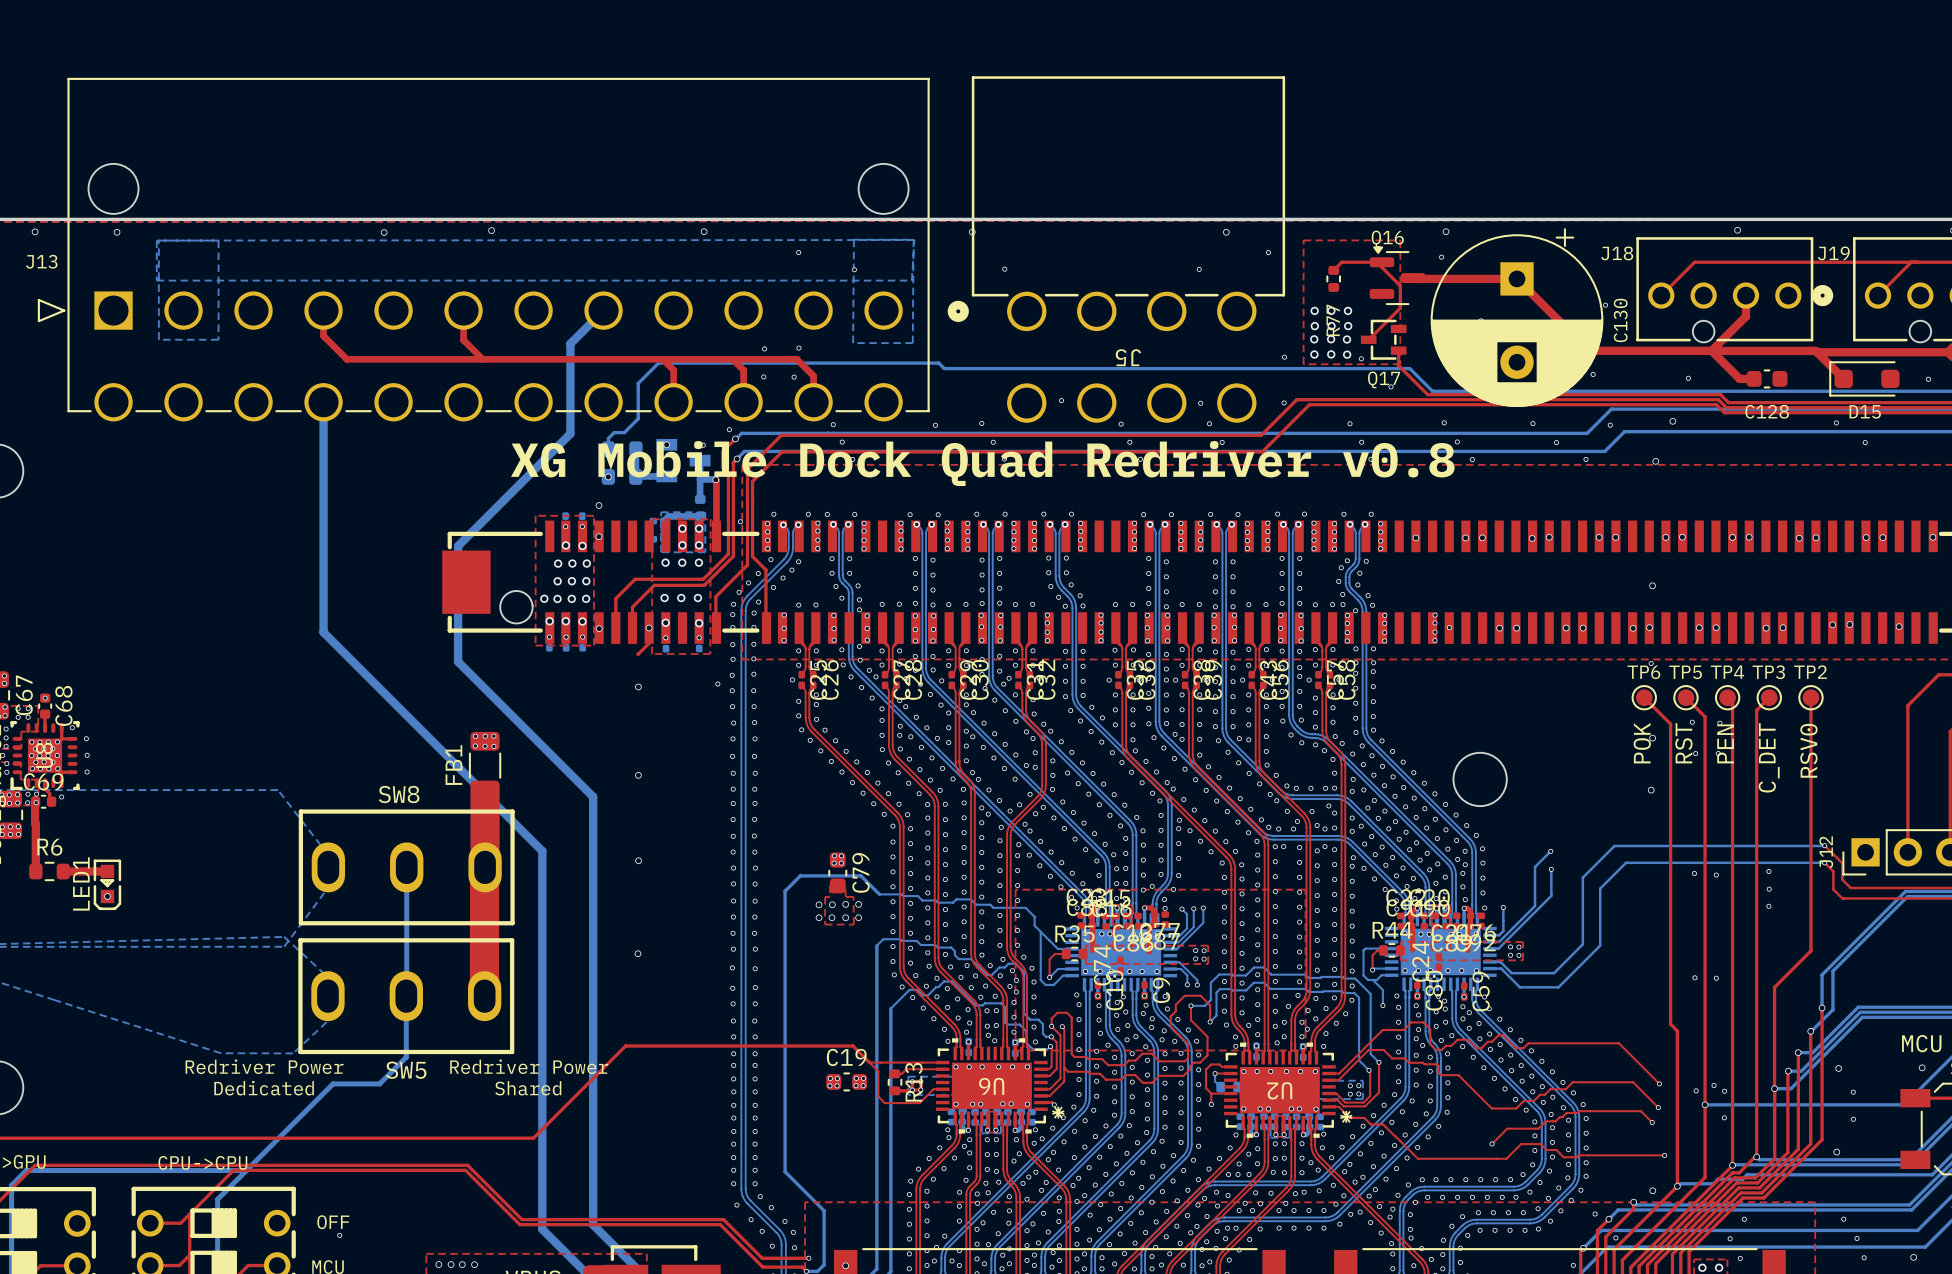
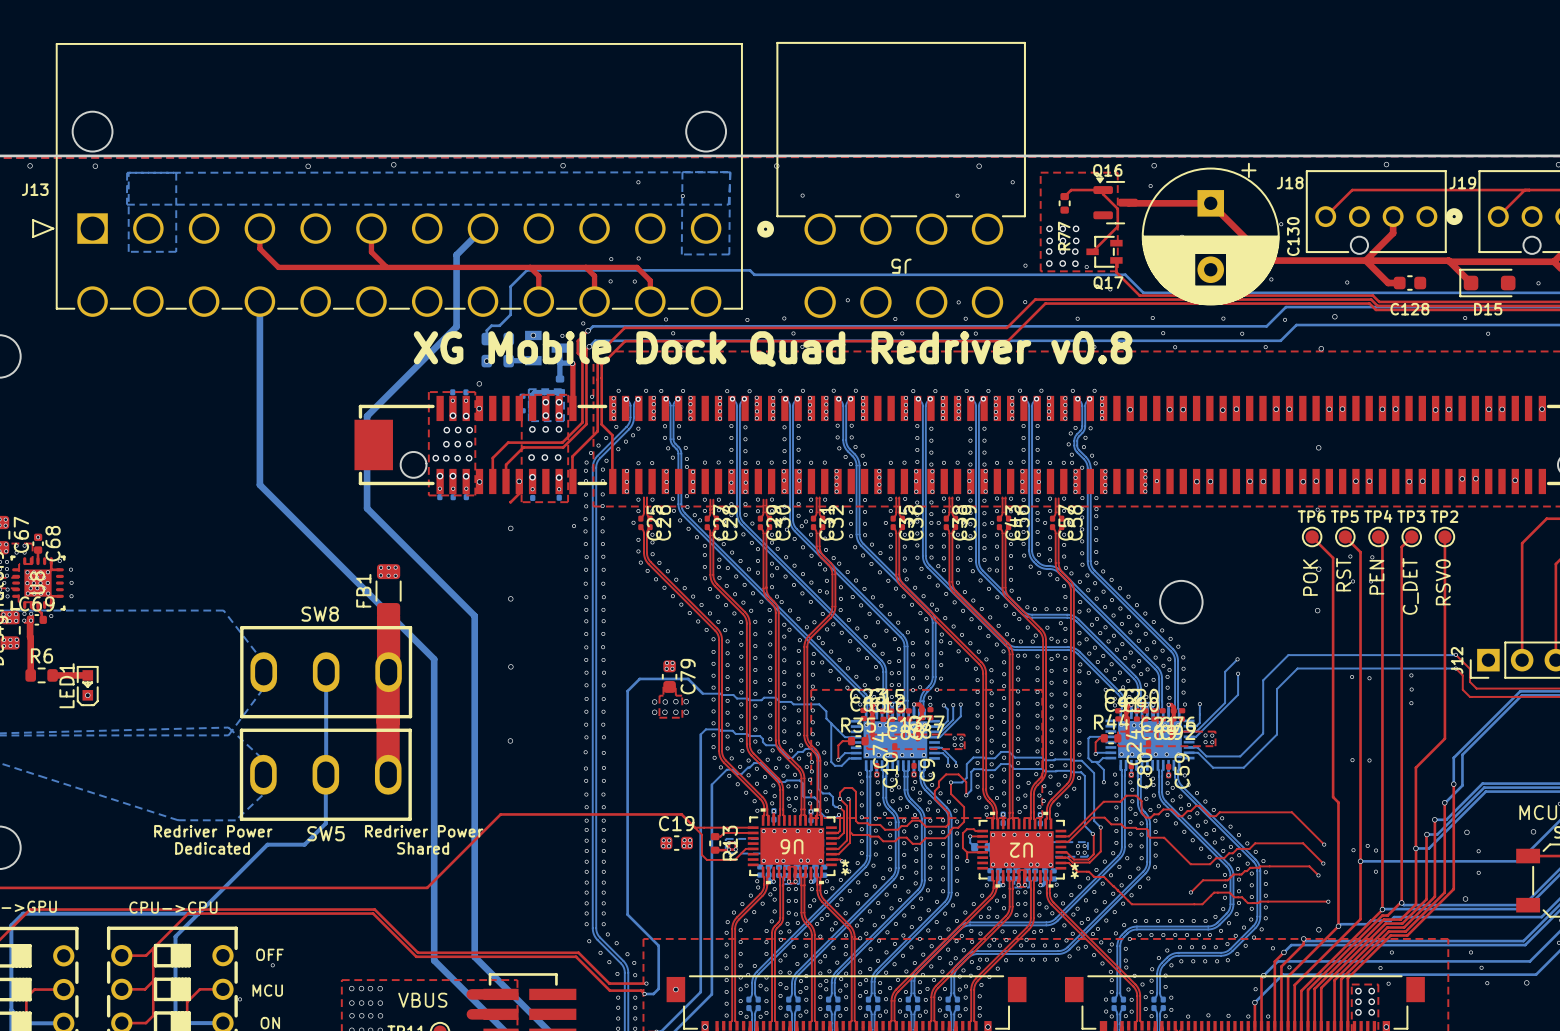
drawing: [799, 641, 816, 649] -> none
drawing: [883, 641, 899, 651] -> none
drawing: [949, 641, 966, 651] -> none
drawing: [1016, 641, 1032, 649] -> none
drawing: [1116, 641, 1132, 649] -> none
drawing: [1183, 641, 1199, 649] -> none
drawing: [1249, 641, 1266, 649] -> none
drawing: [1316, 641, 1332, 650] -> none

